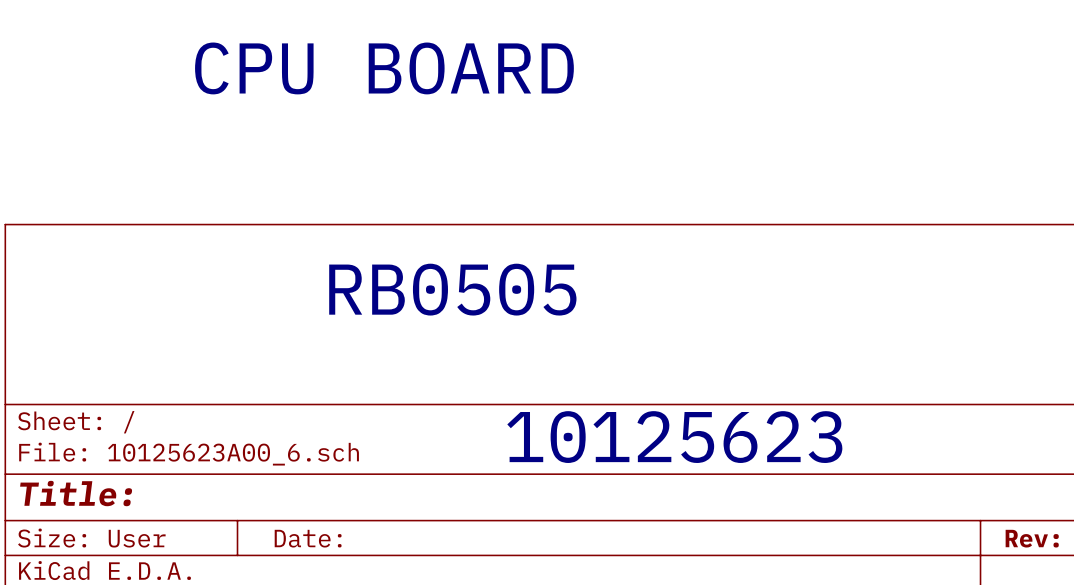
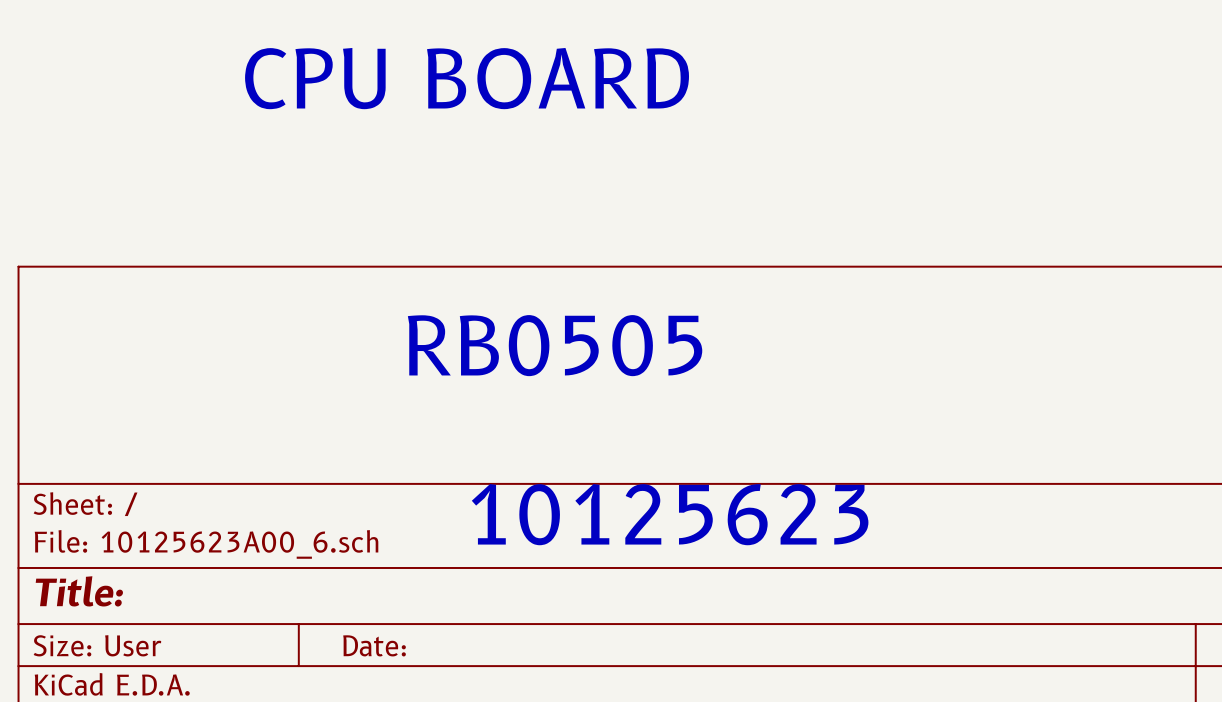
text position: 10125623 (674, 437) -> 10125623 (670, 514)

